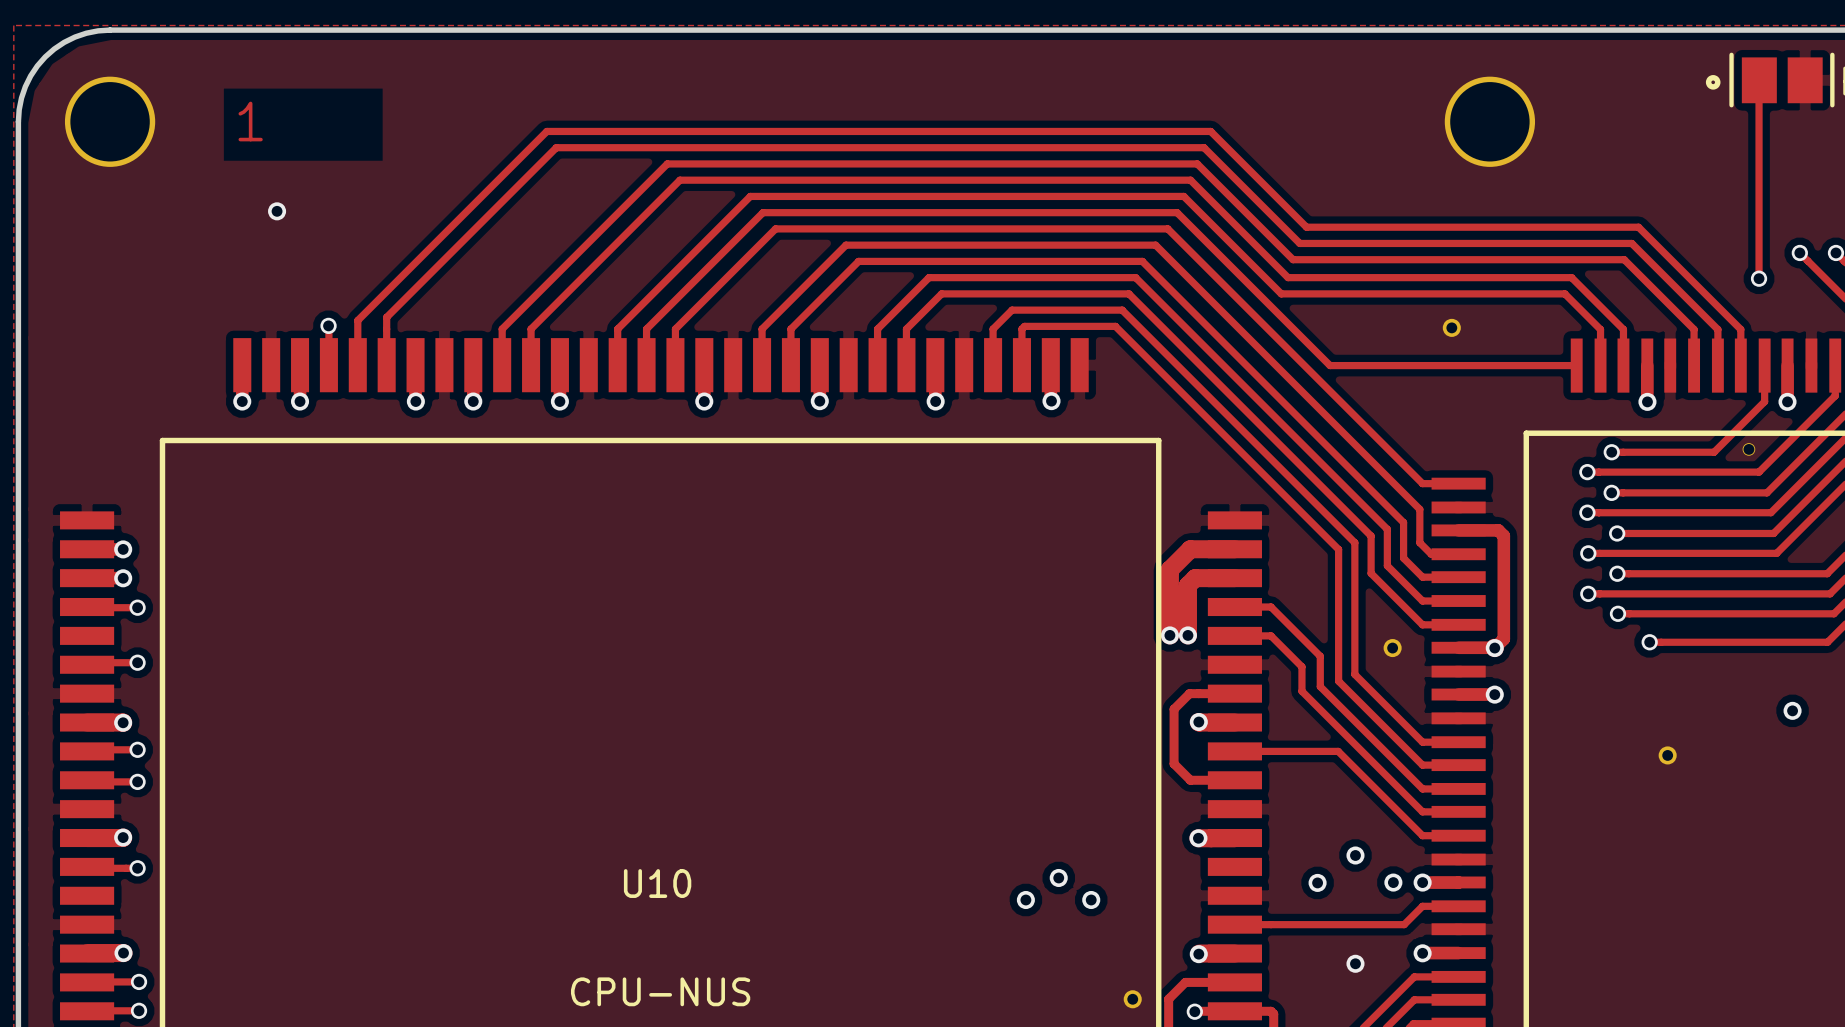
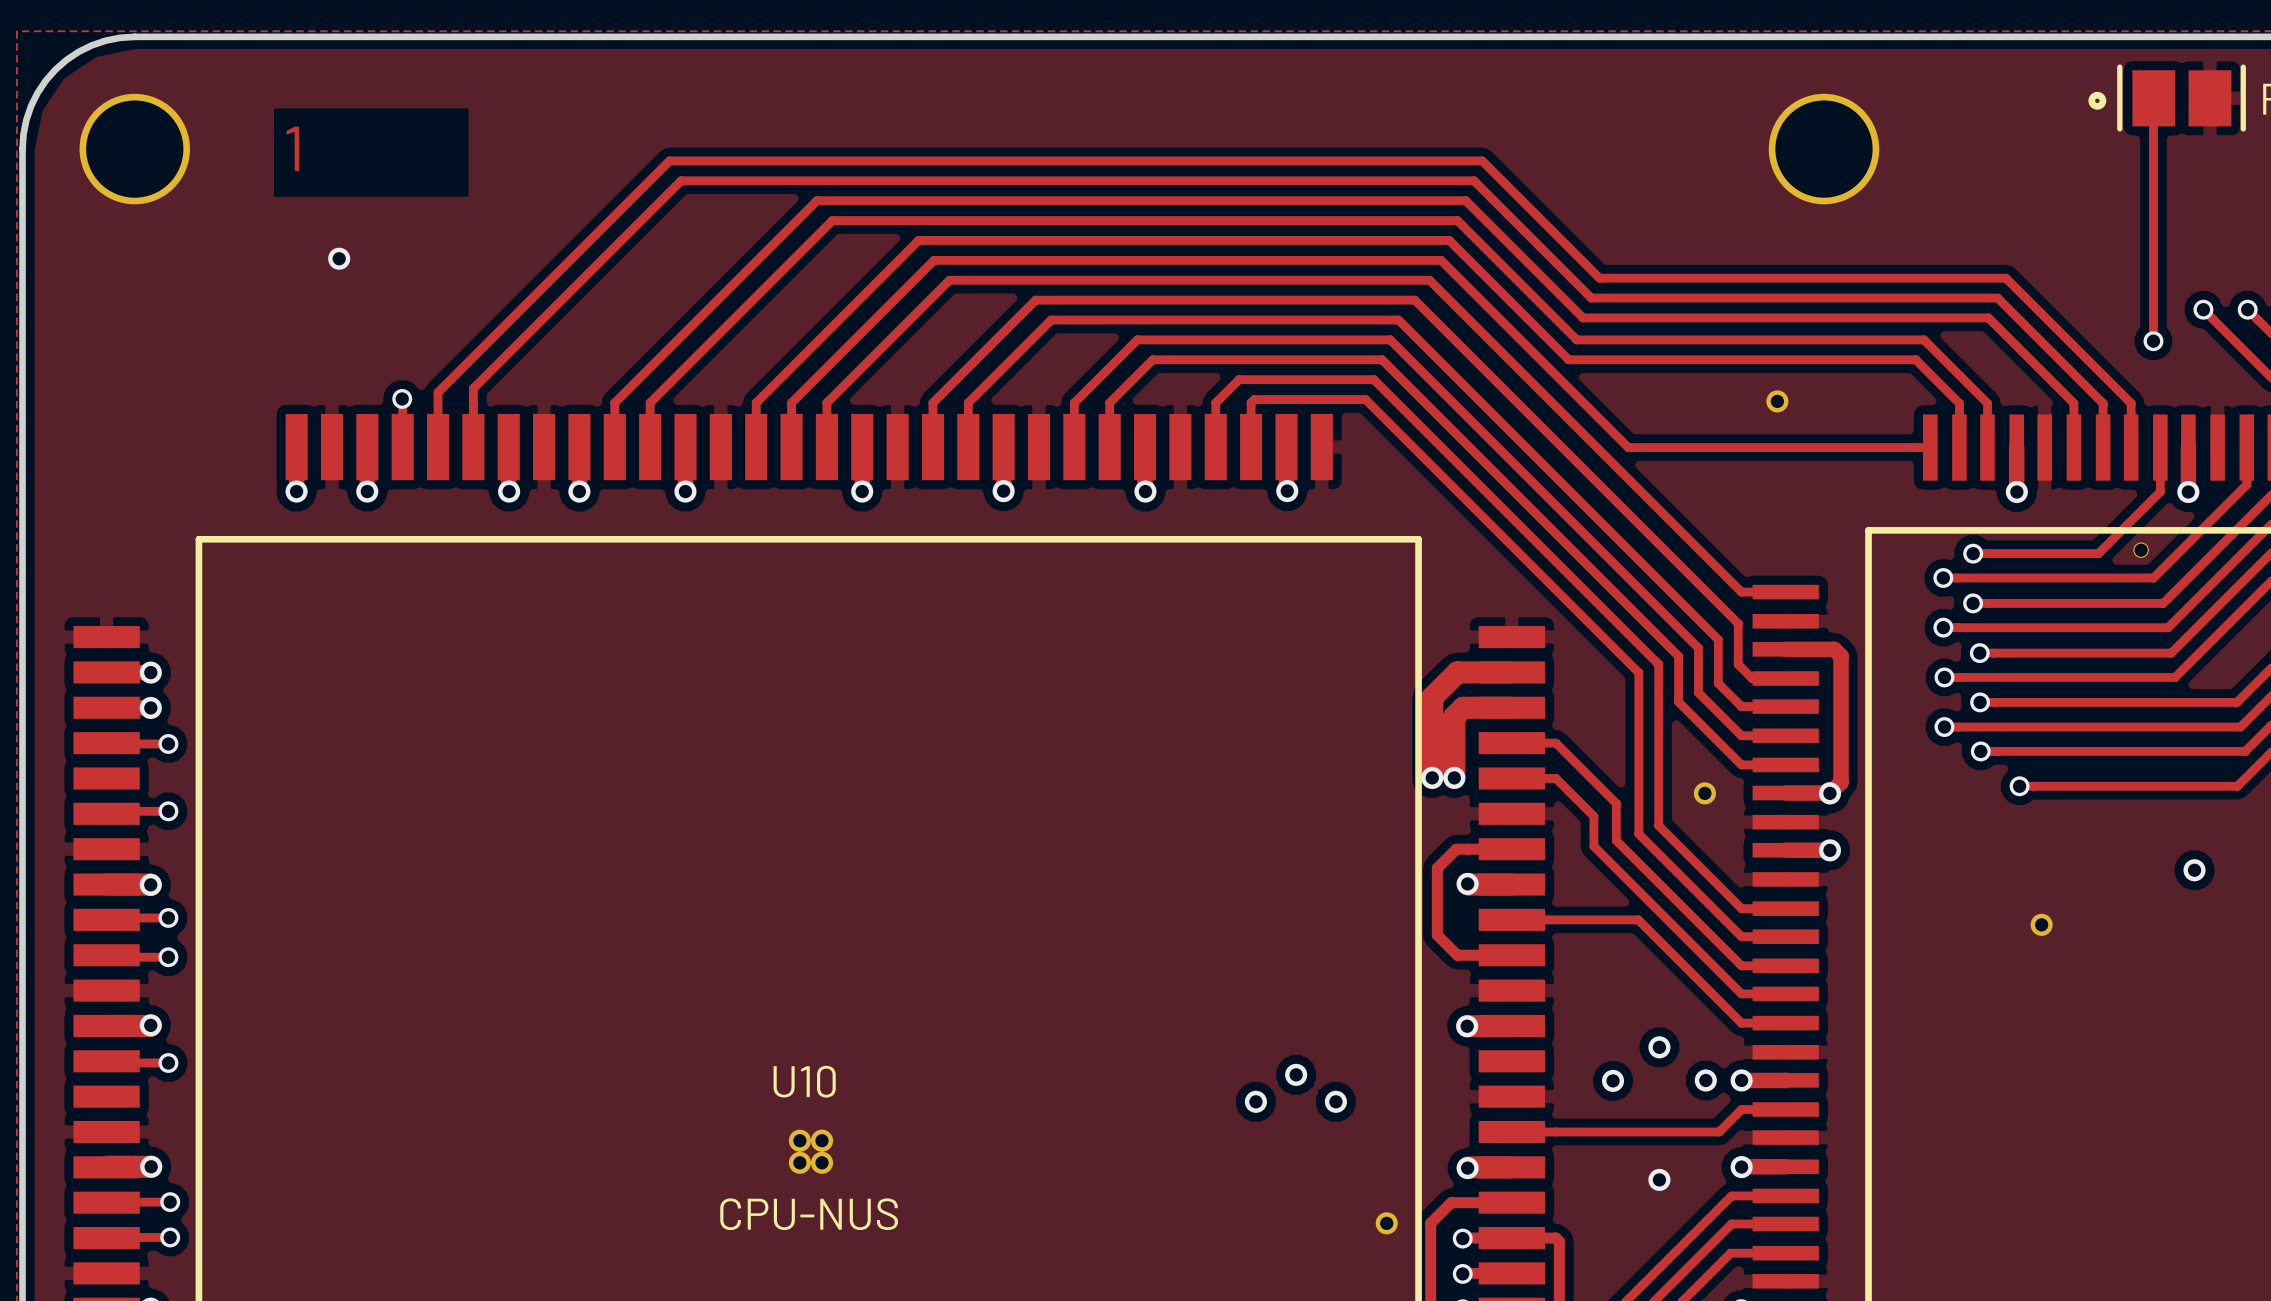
part: none -> (799, 1140)
part: none -> (822, 1140)
part: none -> (799, 1162)
part: none -> (822, 1162)

